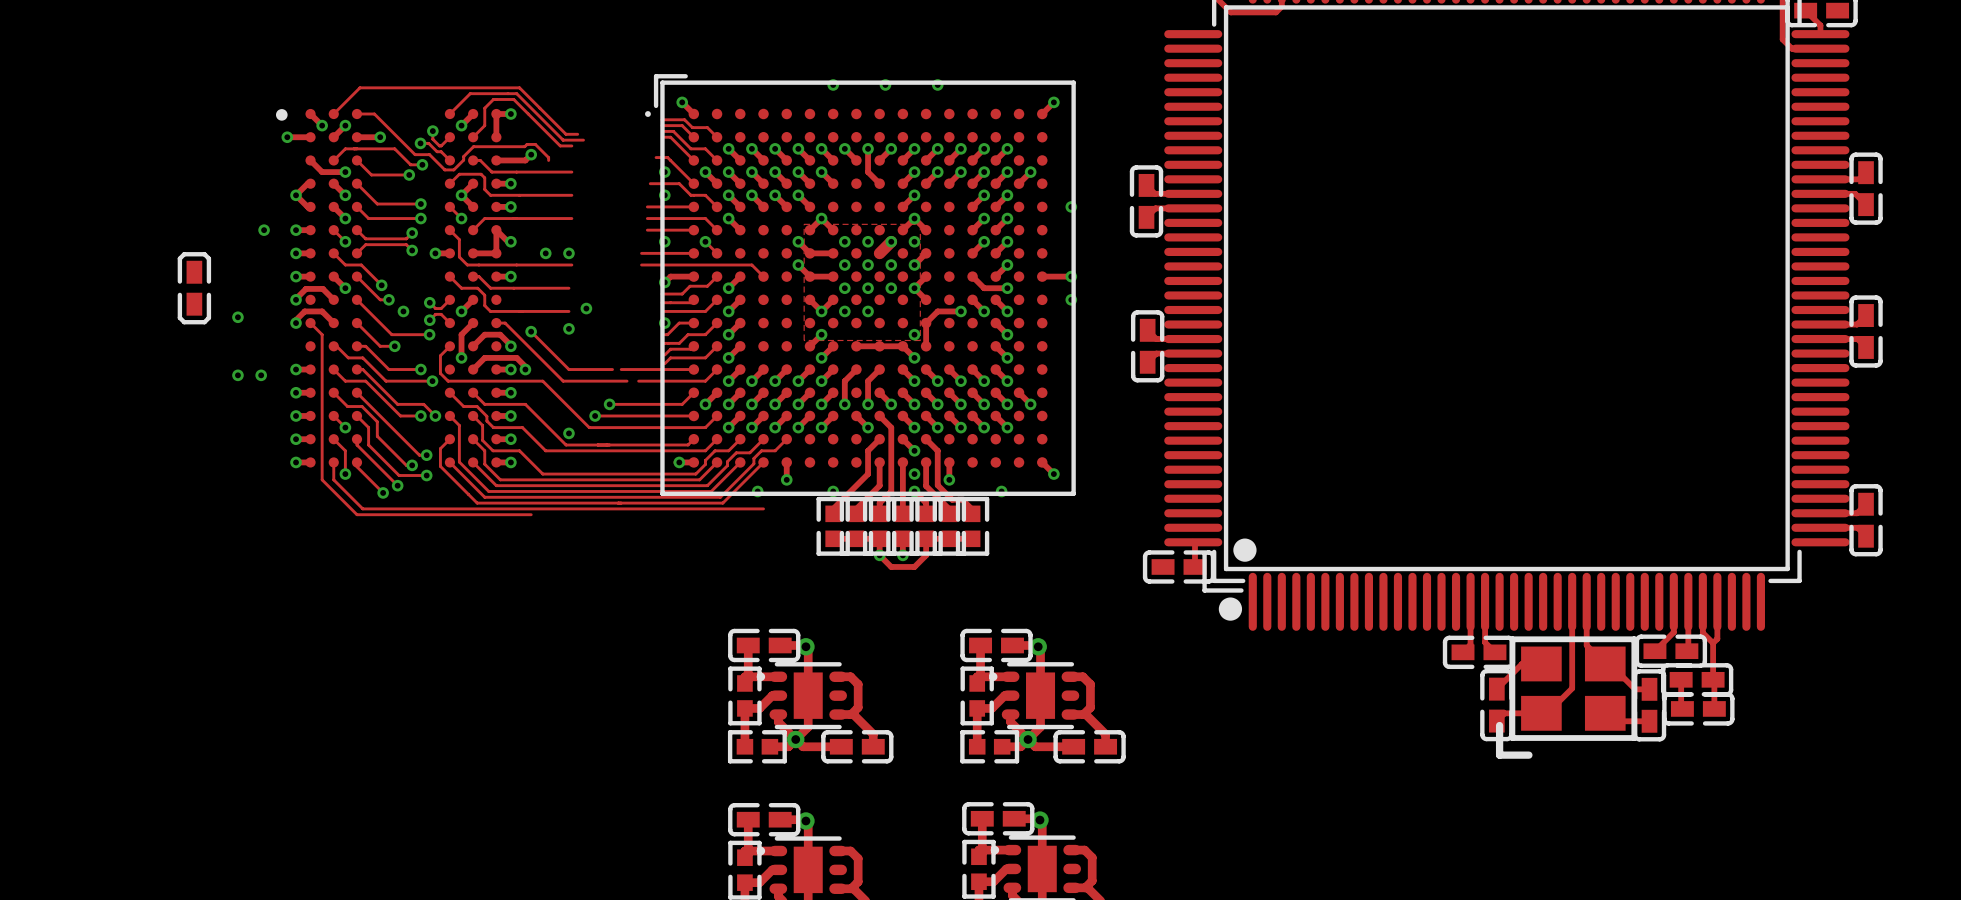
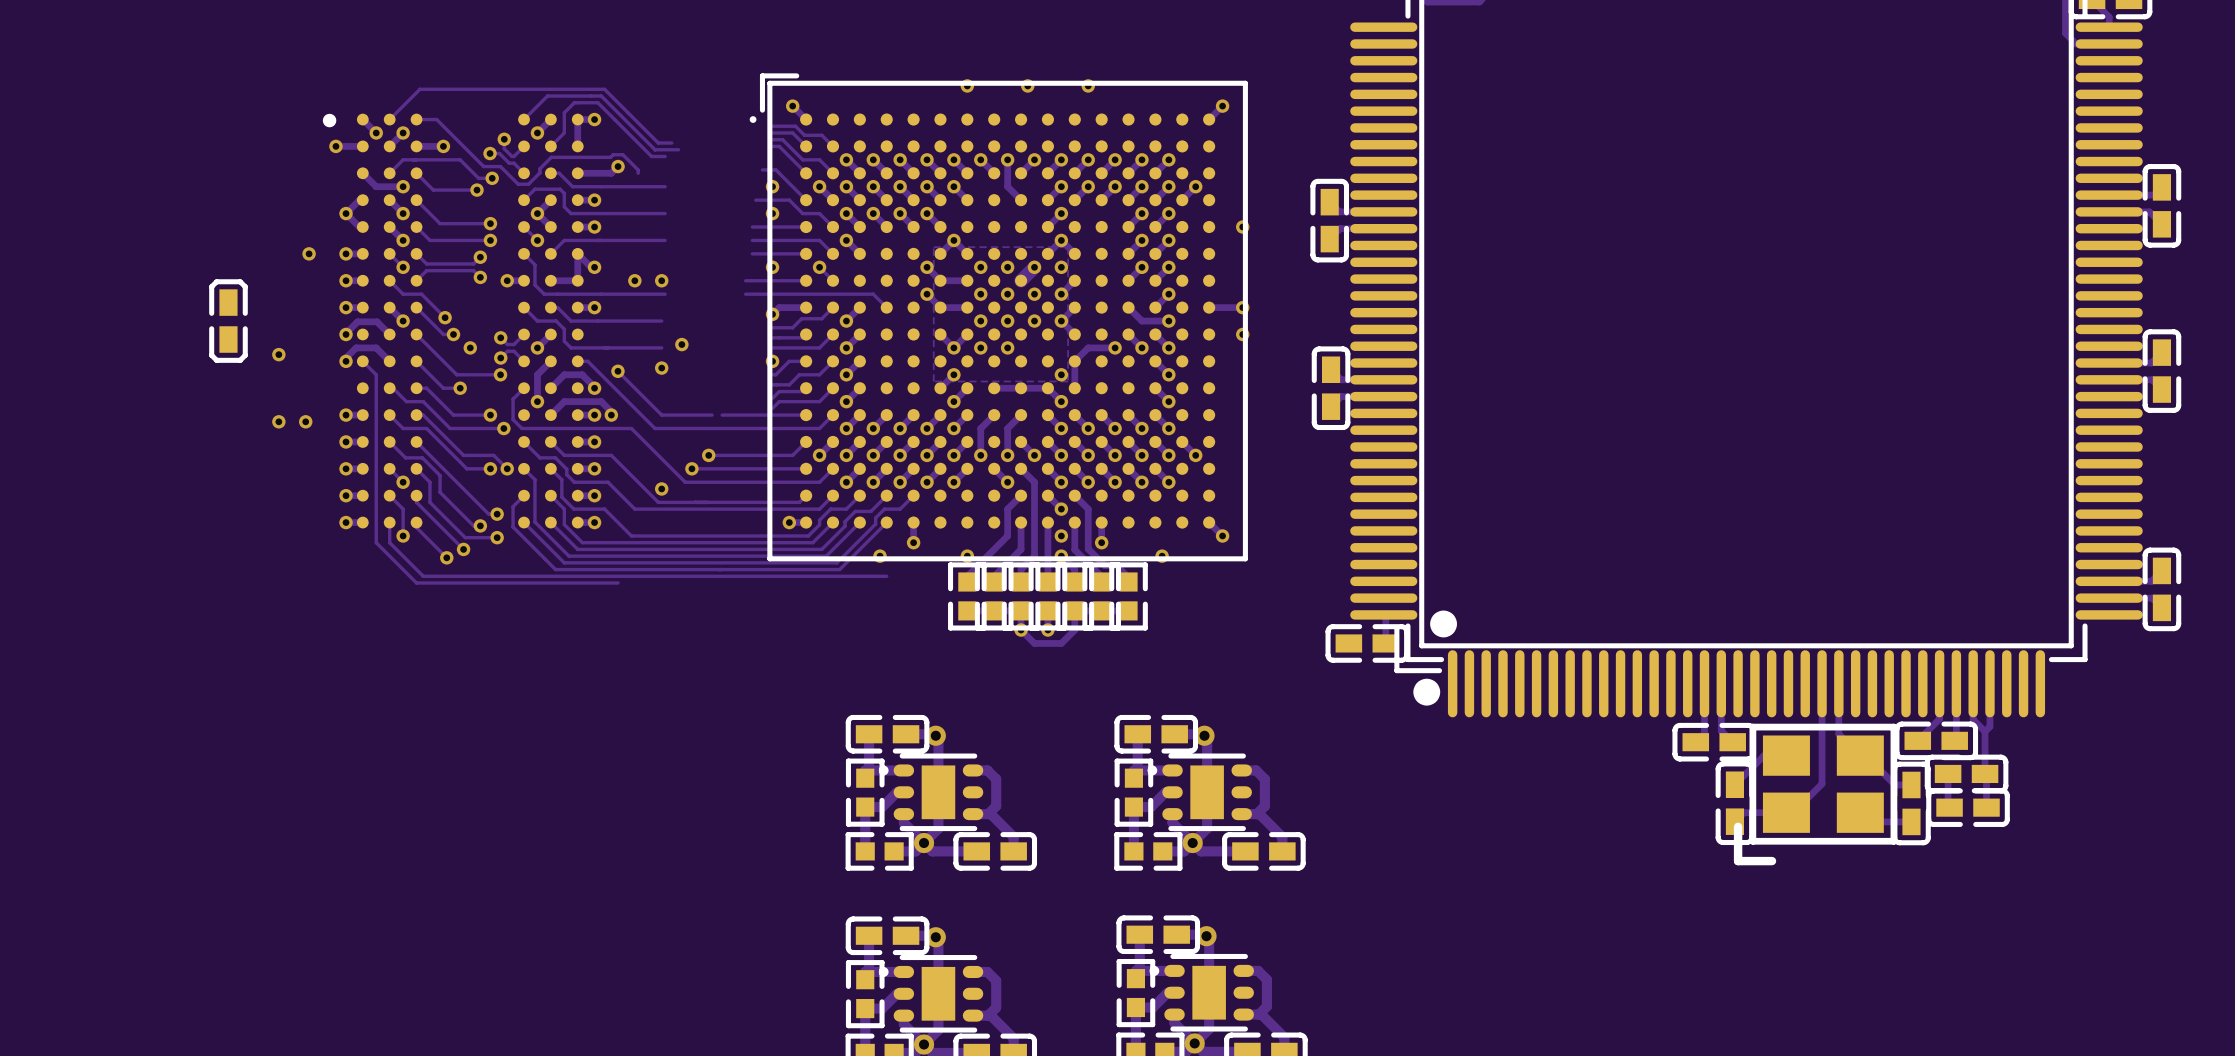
track: none -> (728, 428) (742, 428)

